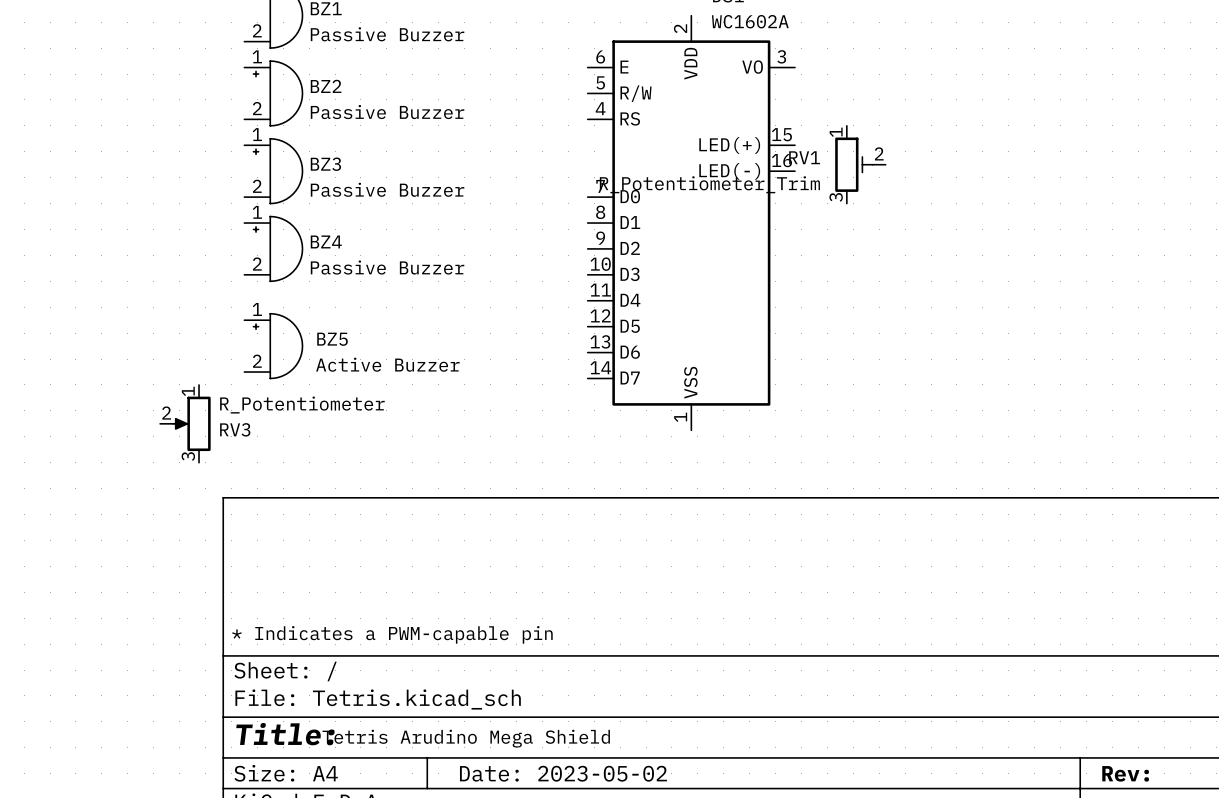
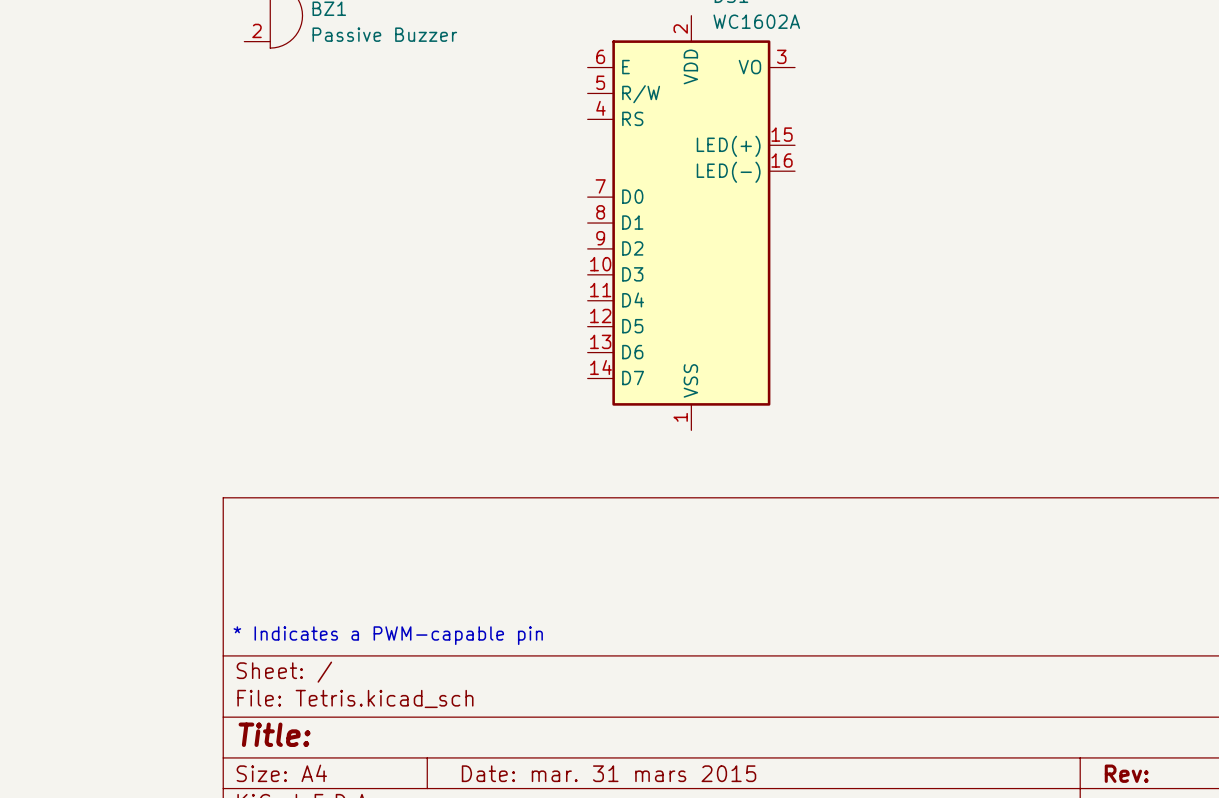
BZ2: Passive Buzzer (273, 93) -> none
RV1: R_Potentiometer_Trim (860, 164) -> none
BZ3: Passive Buzzer (273, 171) -> none
BZ4: Passive Buzzer (273, 248) -> none
BZ5: Active Buzzer (273, 346) -> none
RV3: R_Potentiometer (185, 423) -> none
text: Tetris Arudino Mega Shield (466, 738) -> none
title block: Date: 2023-05-02 (563, 773) -> Date: mar. 31 mars 2015 (609, 773)

